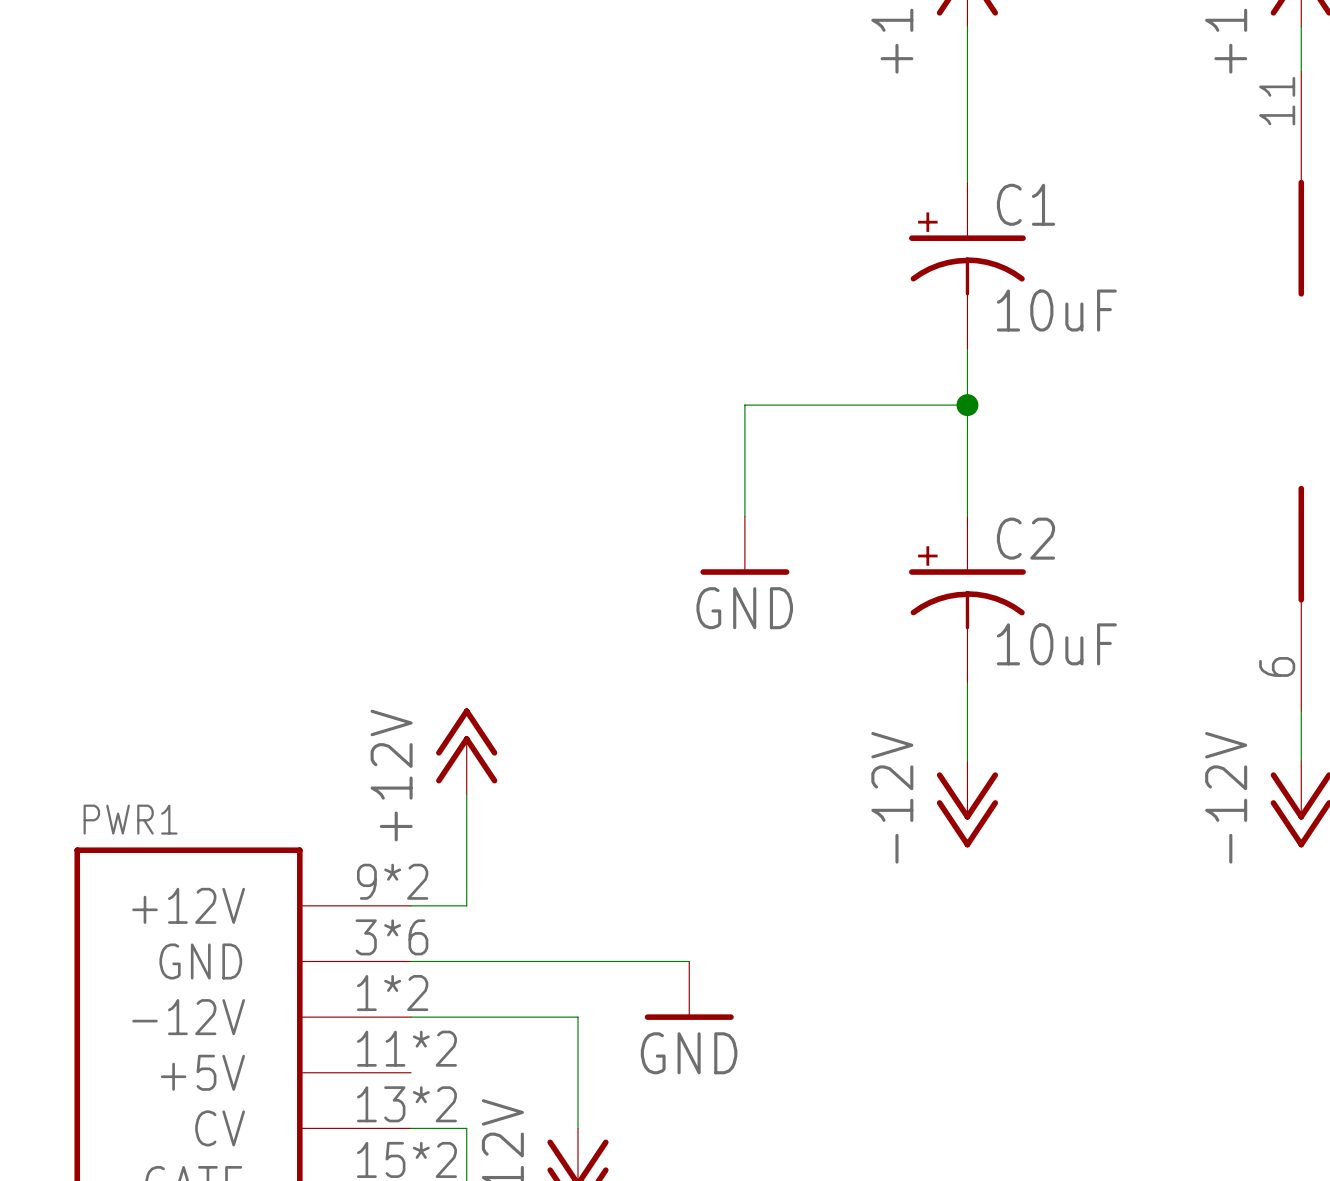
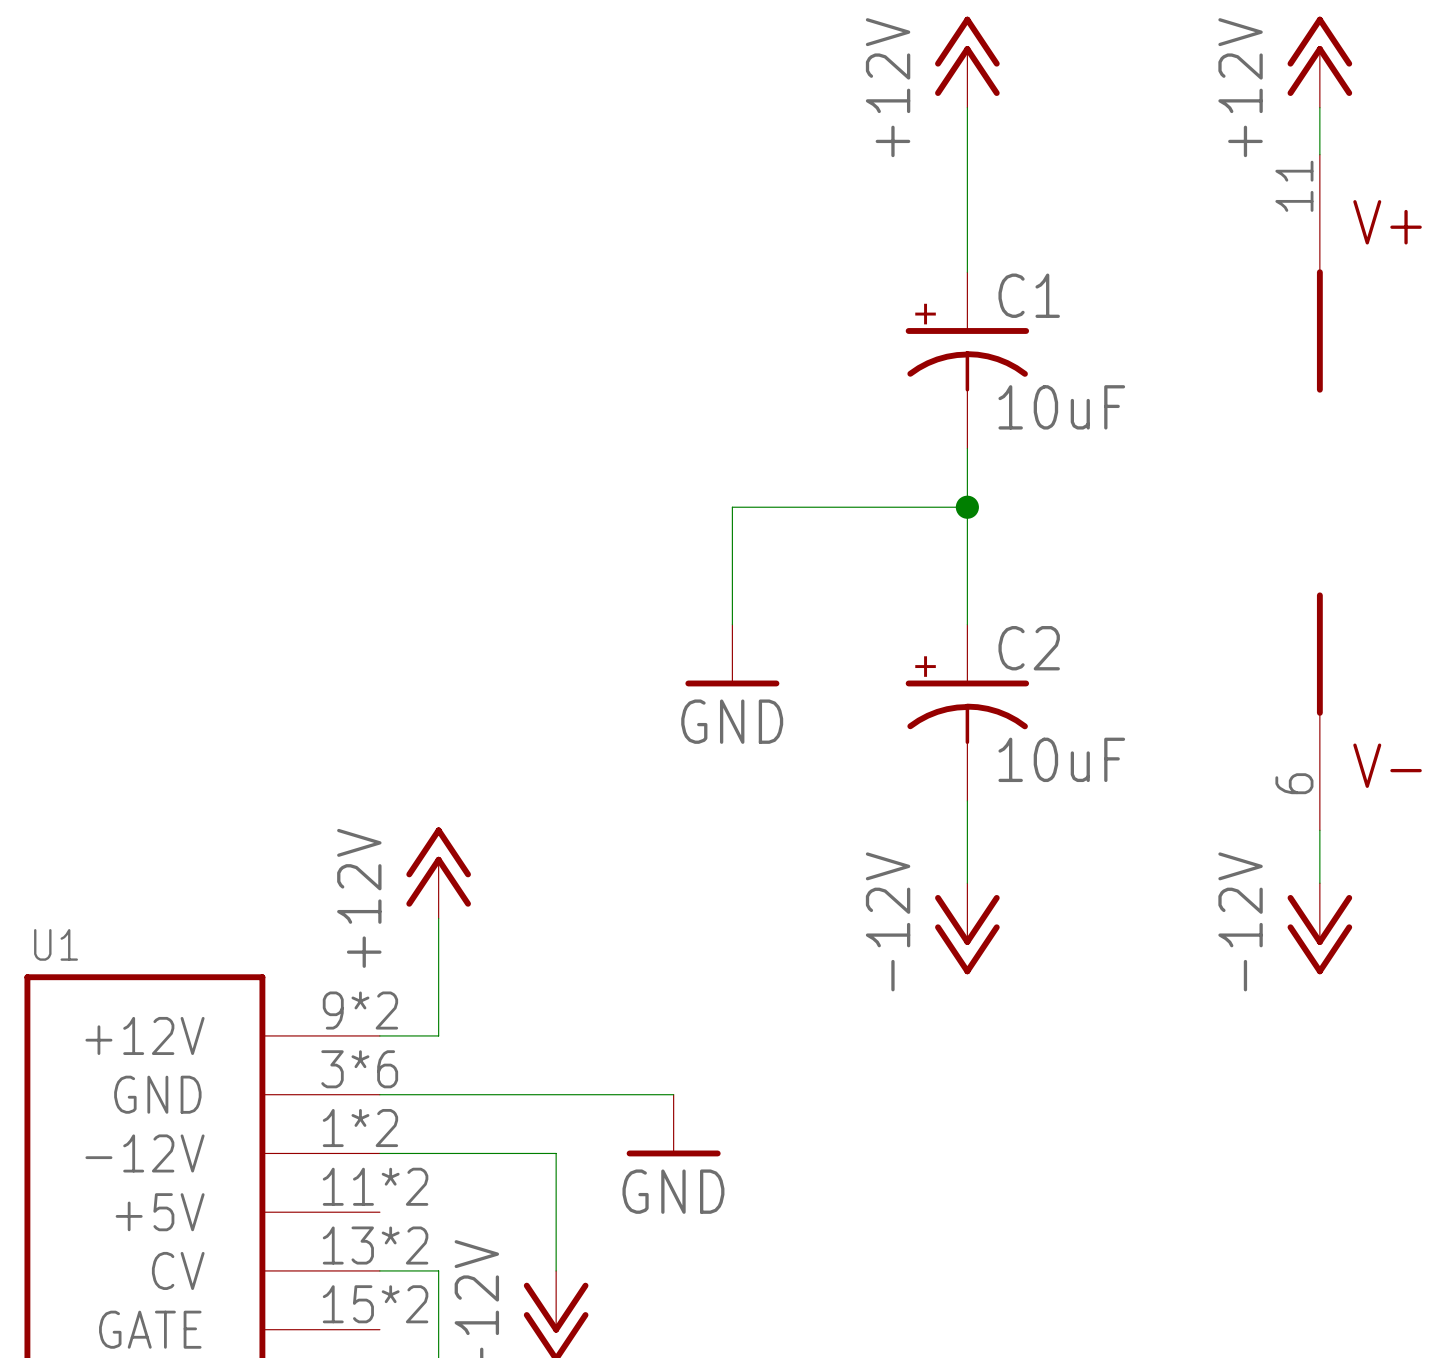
PWR1 name: PWR1 (130, 819) -> U1 (56, 944)

